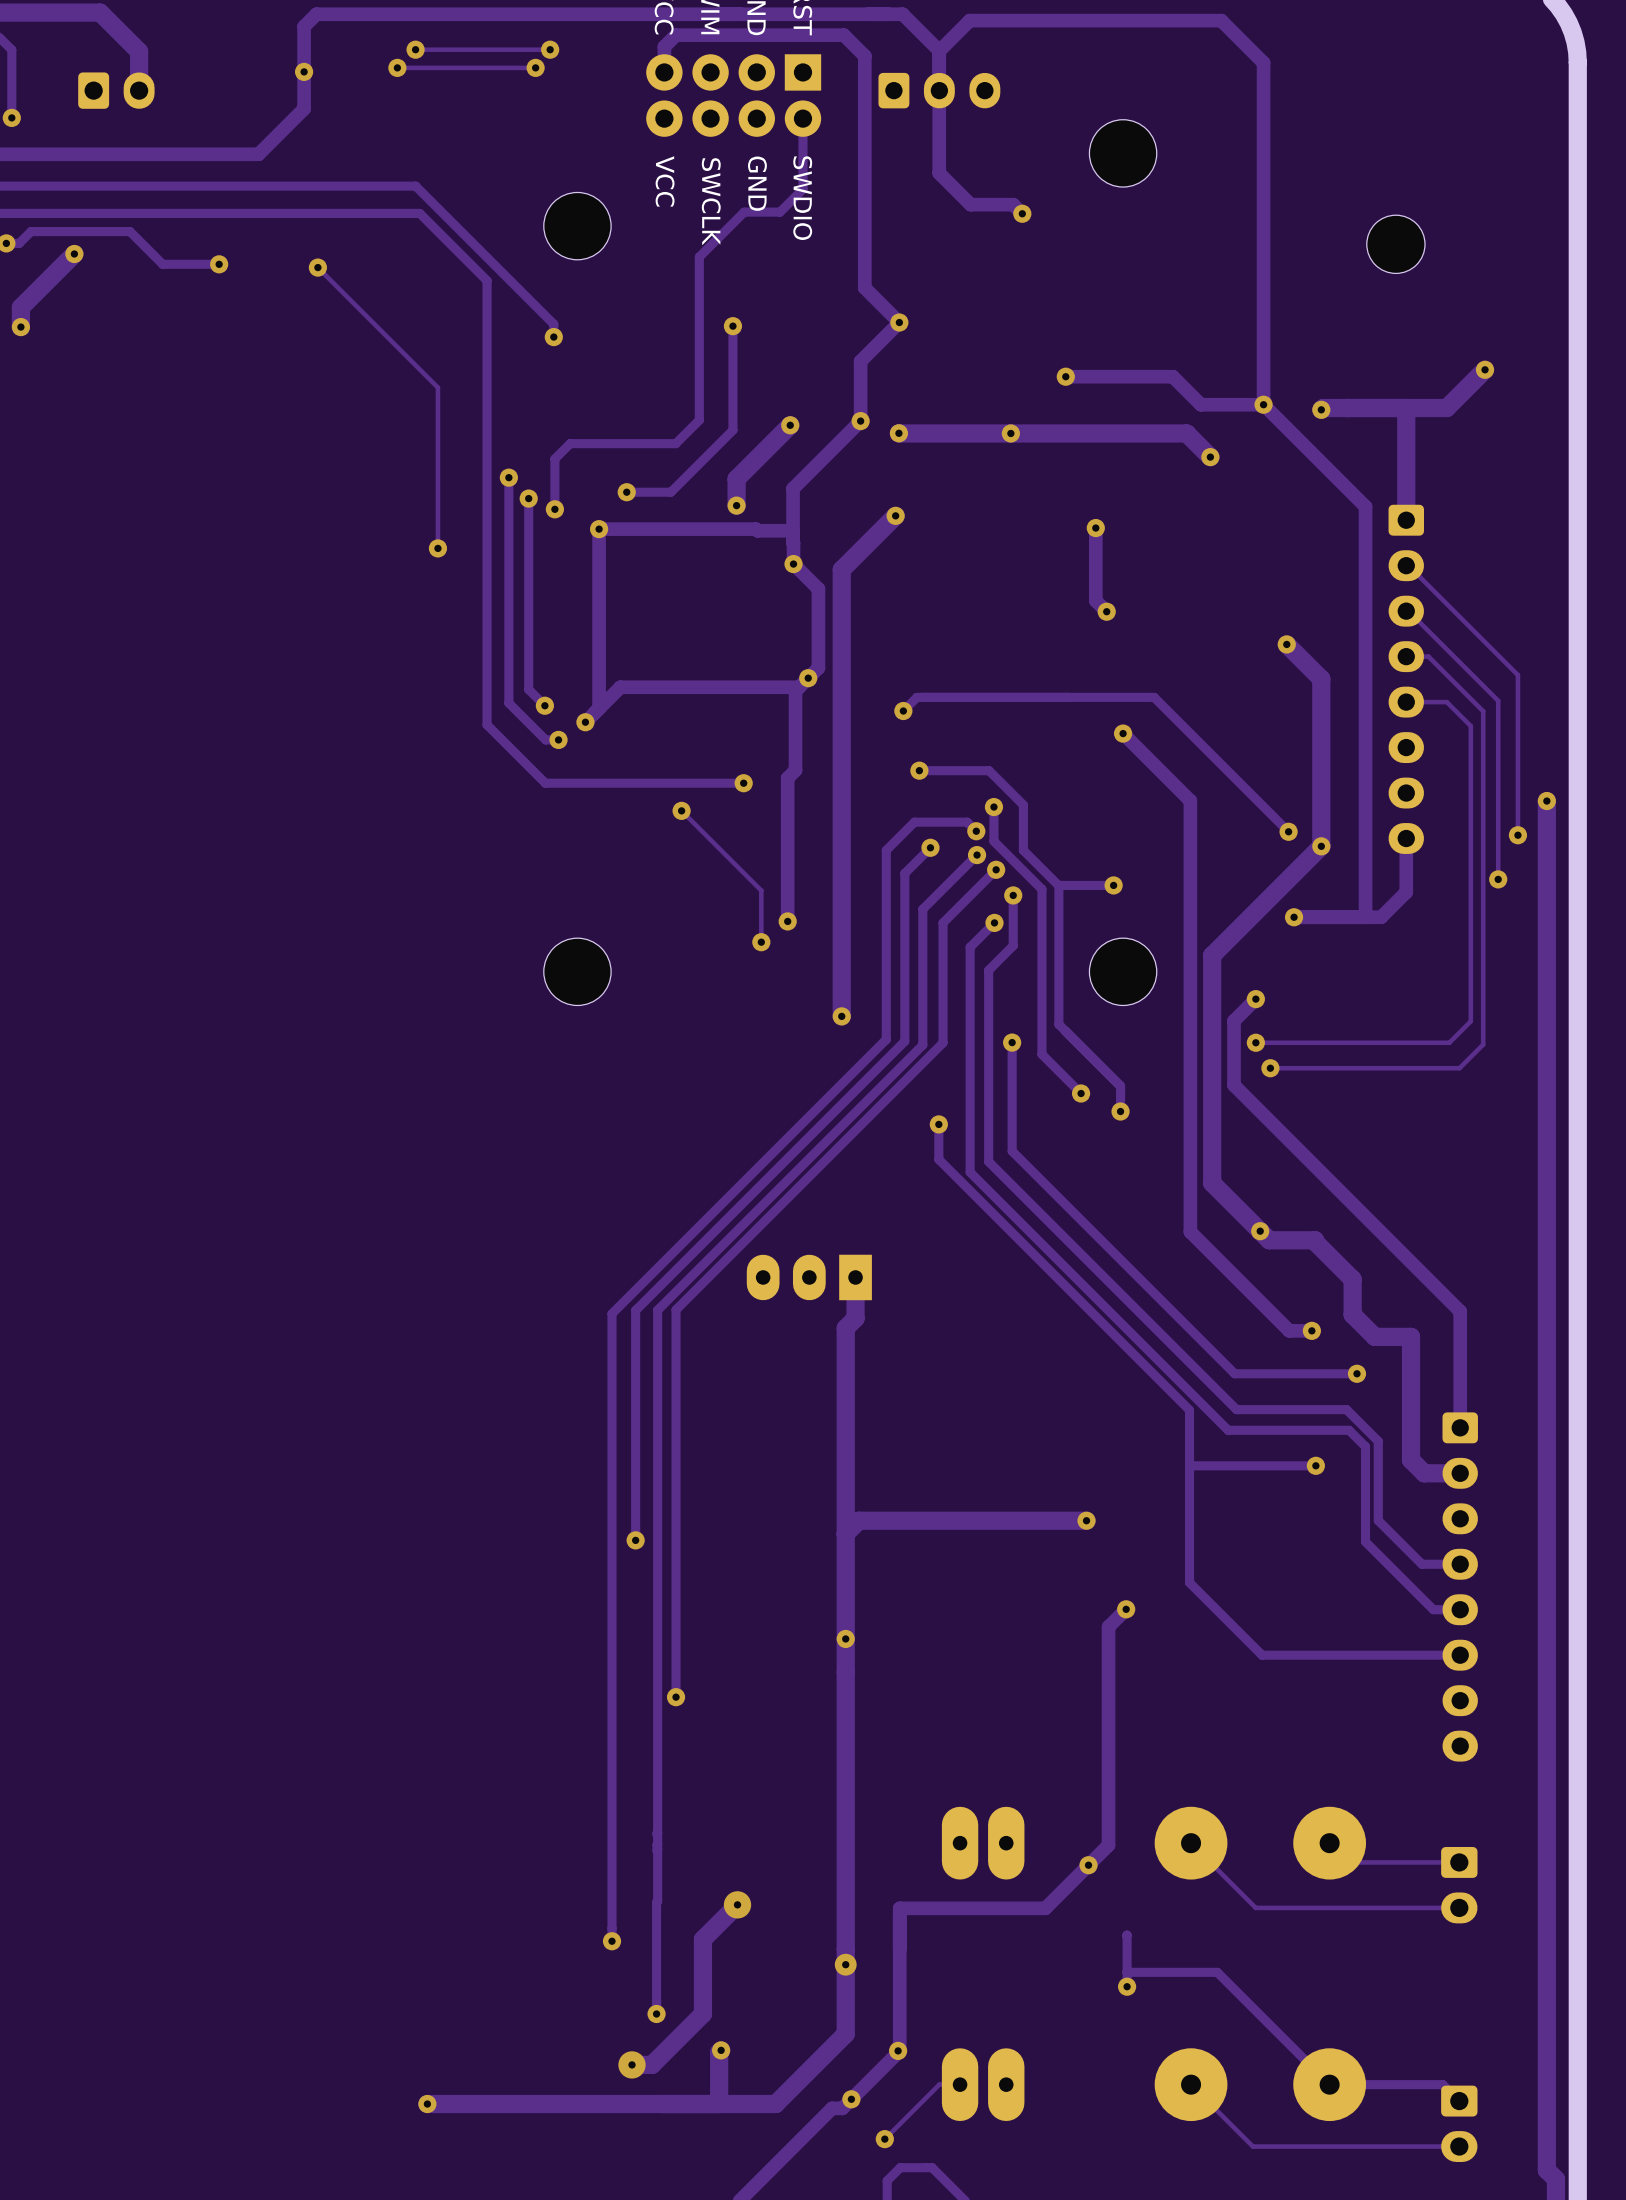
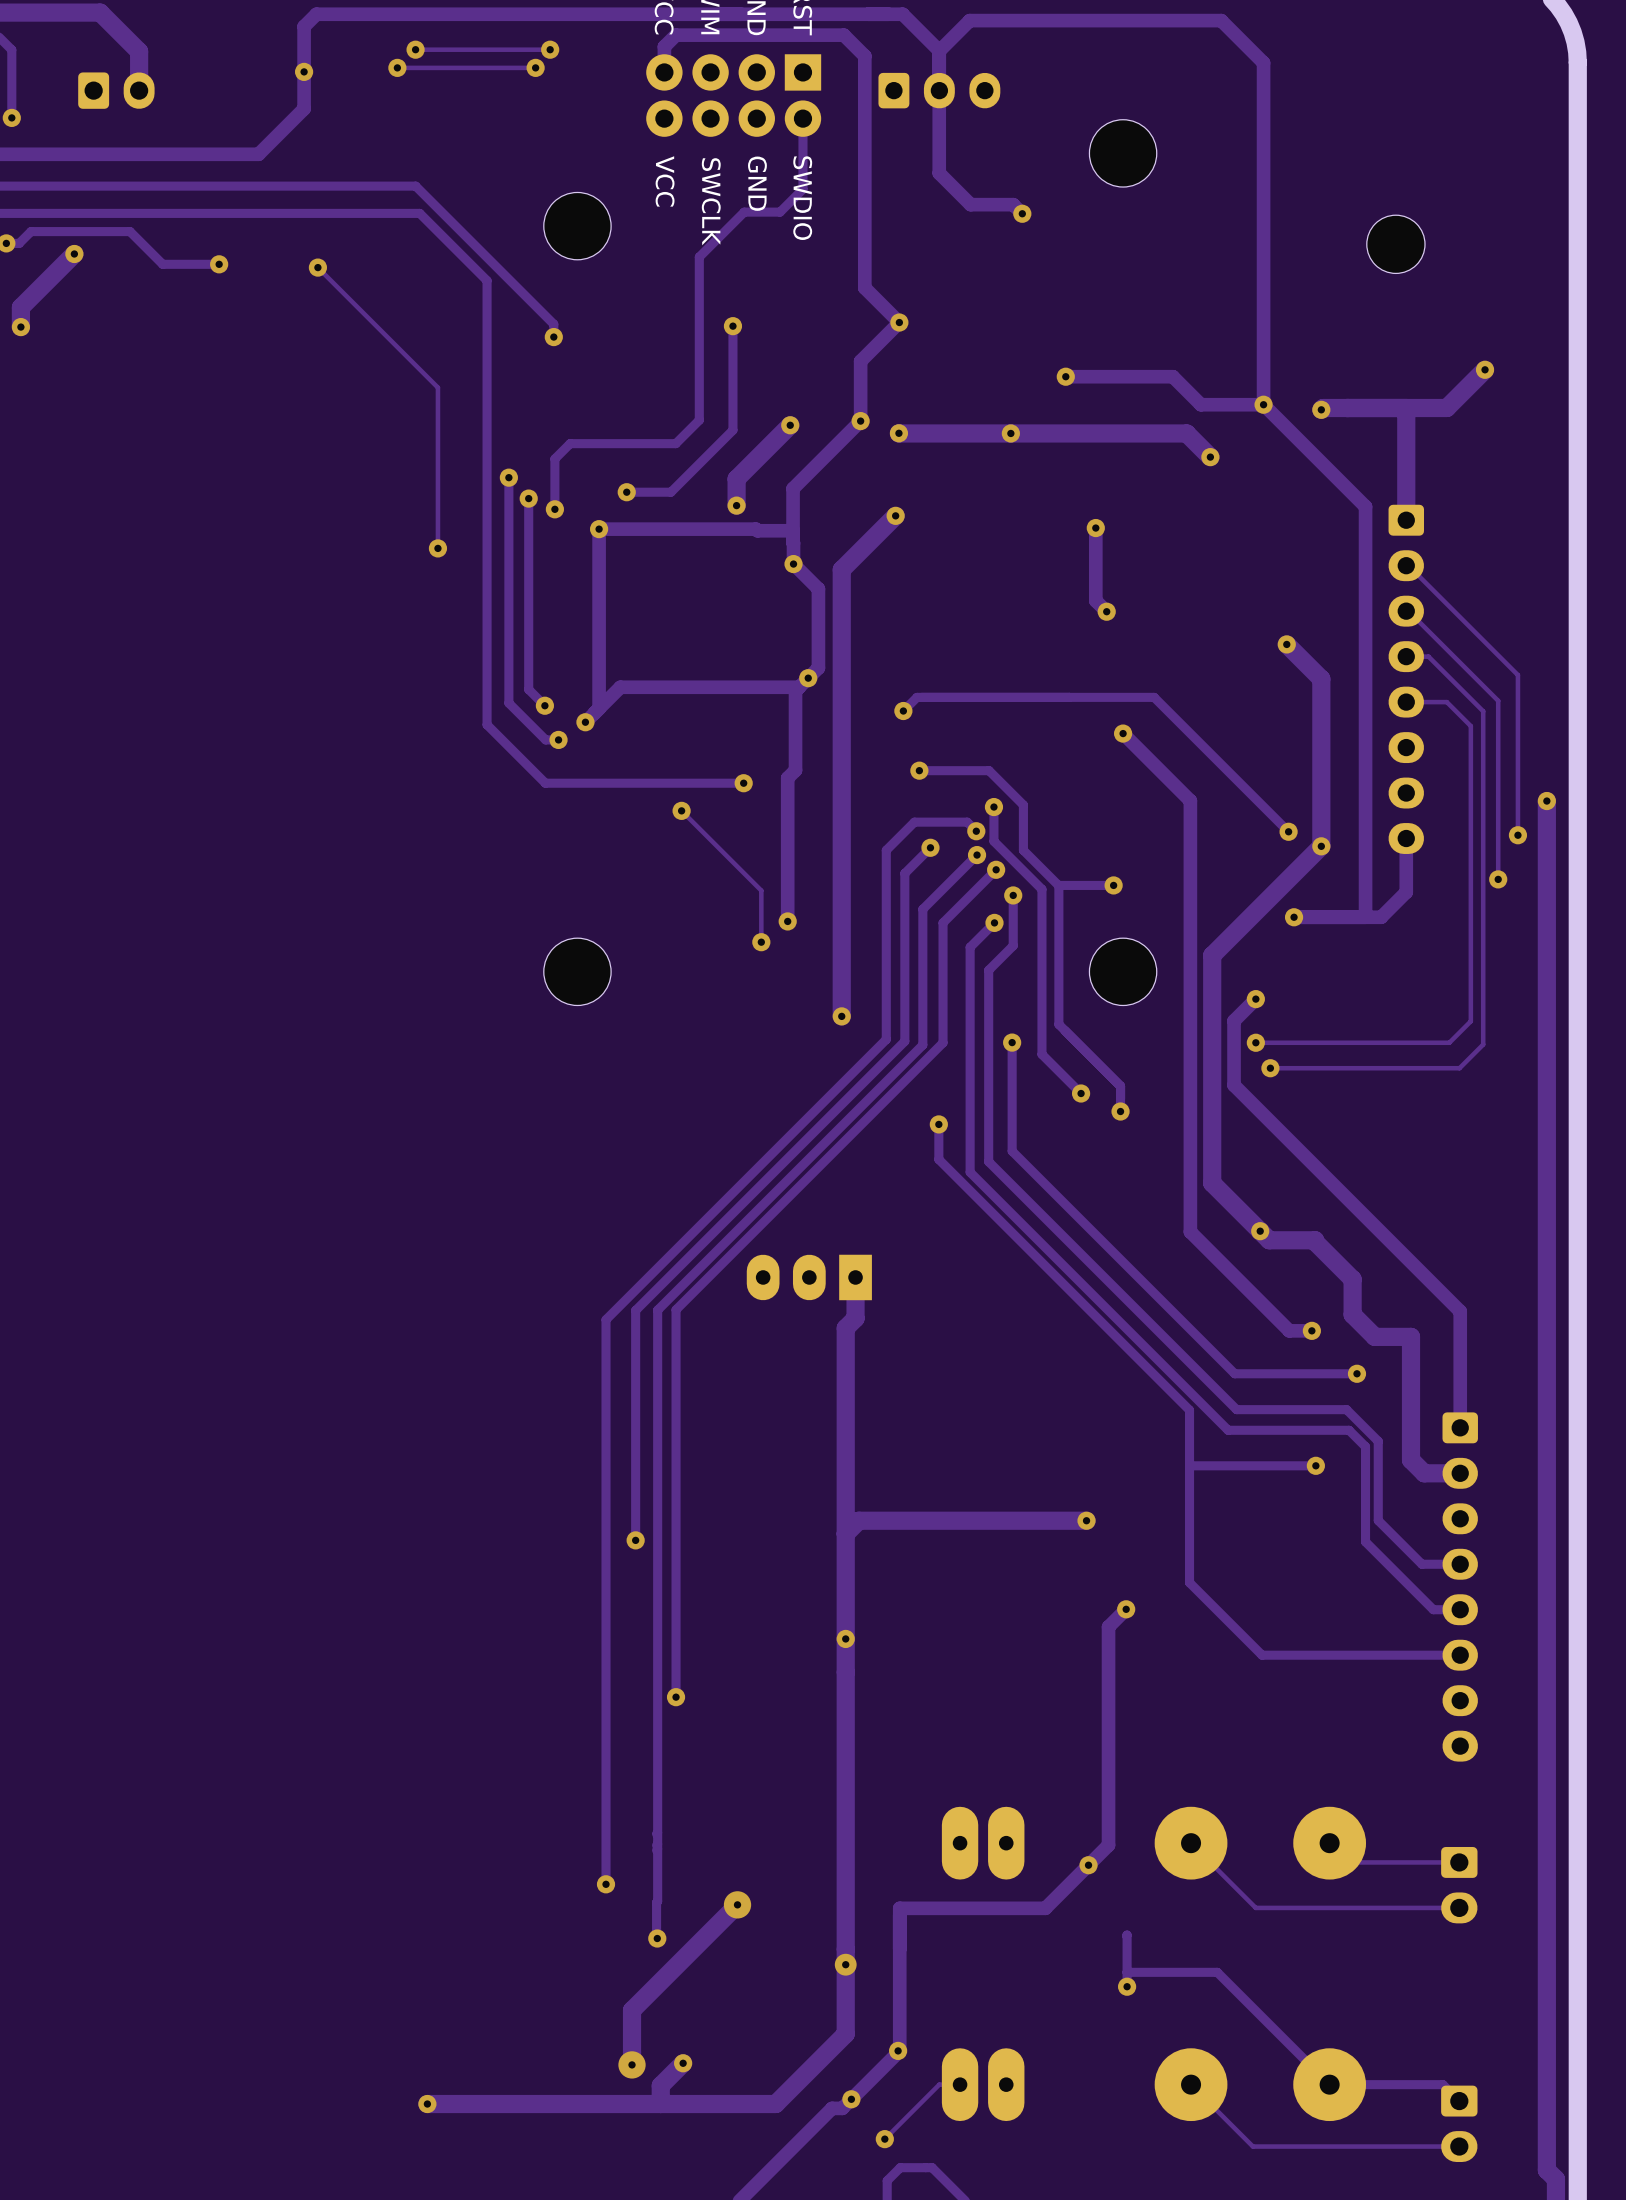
track: (612, 1313) (612, 1941) -> (612, 1313) (606, 1319) (606, 1884)
via: none -> (606, 1884)
track: (656, 1938) (656, 2013) -> none
via: none -> (657, 1938)
track: (702, 1939) (702, 2013) (652, 2064) (632, 2064) -> (702, 1939) (632, 2010) (632, 2064)
via: (612, 1941) -> none
via: (656, 2013) -> none
track: (721, 2050) (719, 2052) (719, 2104) -> none
via: (721, 2050) -> none
track: none -> (683, 2063) (660, 2085) (660, 2104)
via: none -> (683, 2063)

